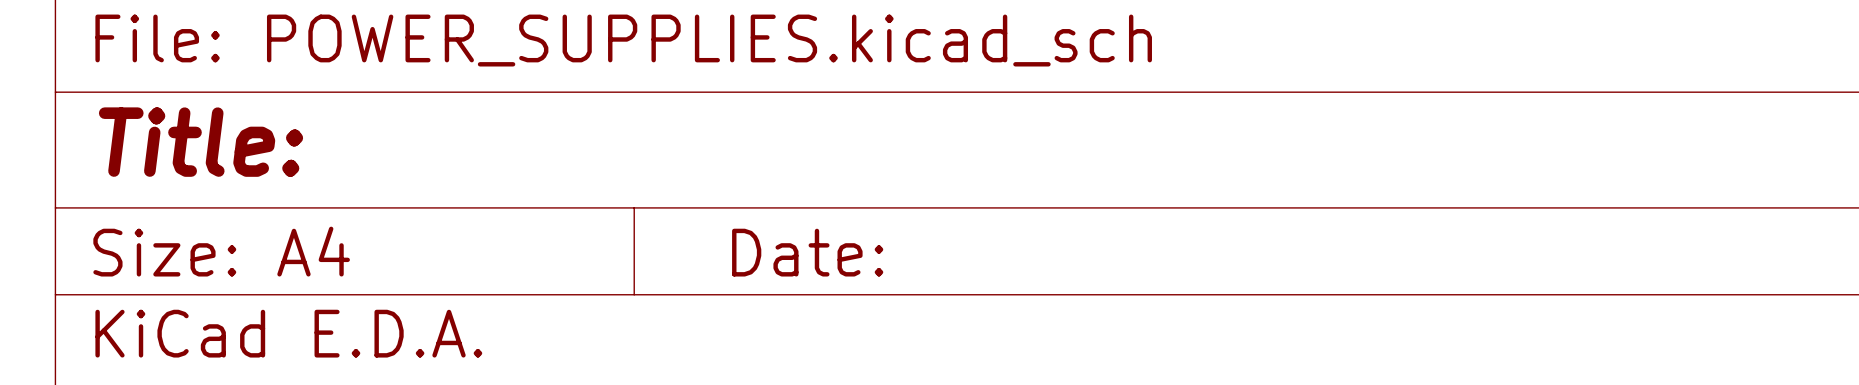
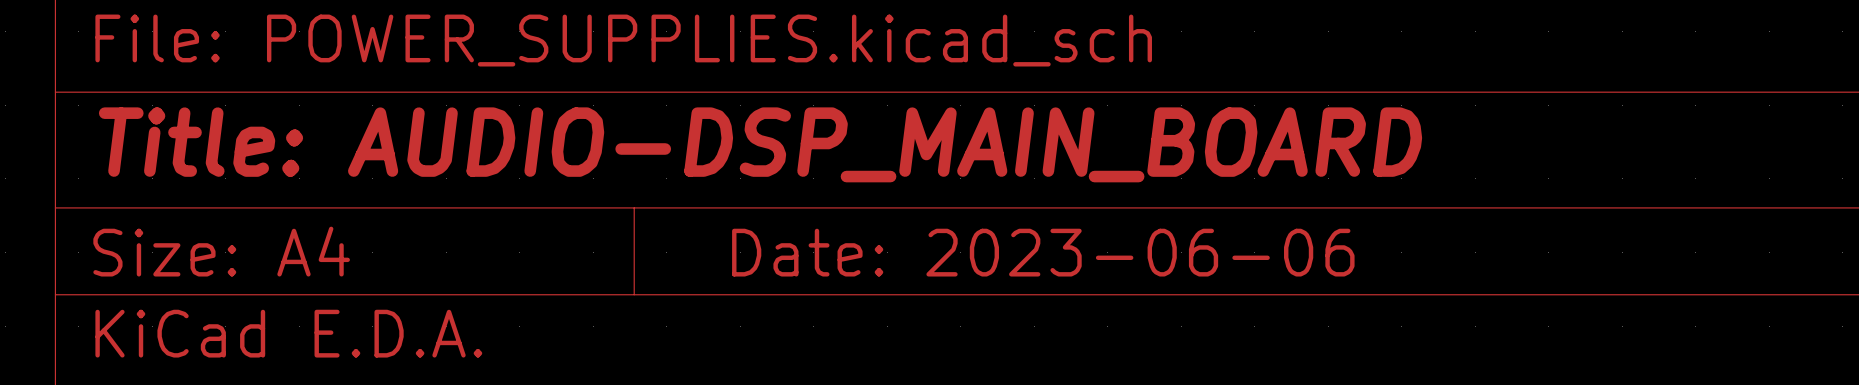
title block: Title: (201, 142) -> Title: AUDIO-DSP_MAIN_BOARD (760, 144)
title block: Date: (807, 252) -> Date: 2023-06-06 (1043, 252)

